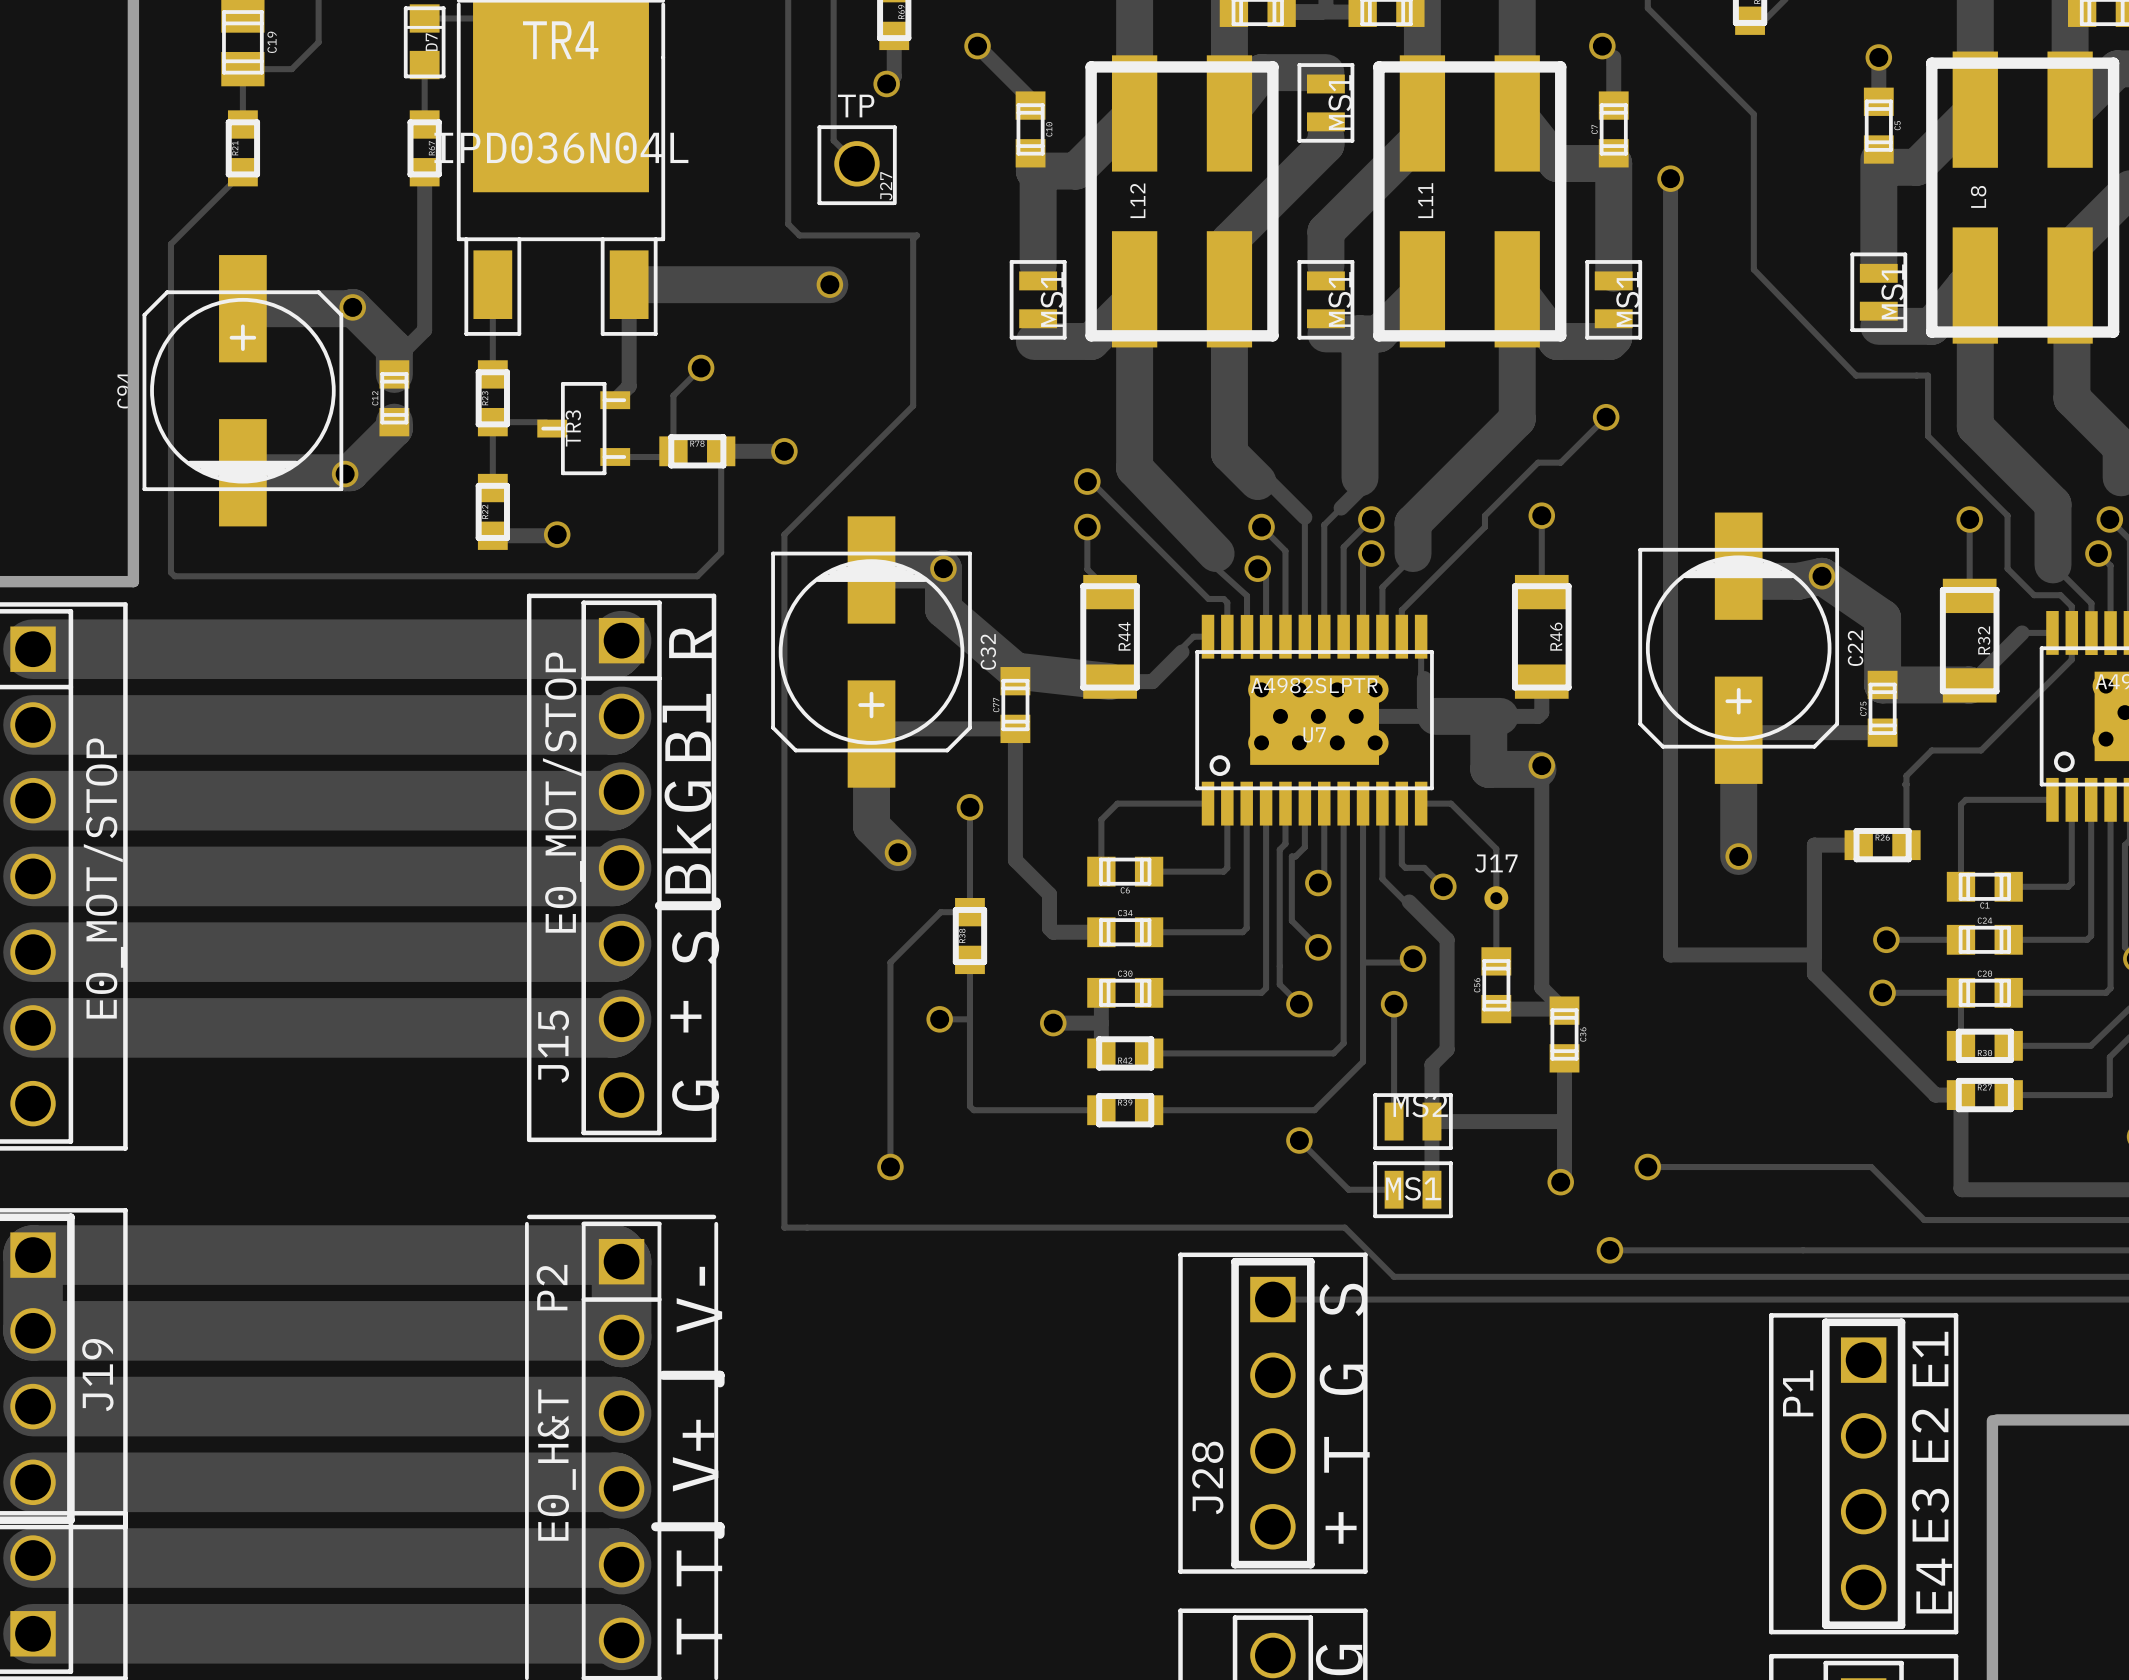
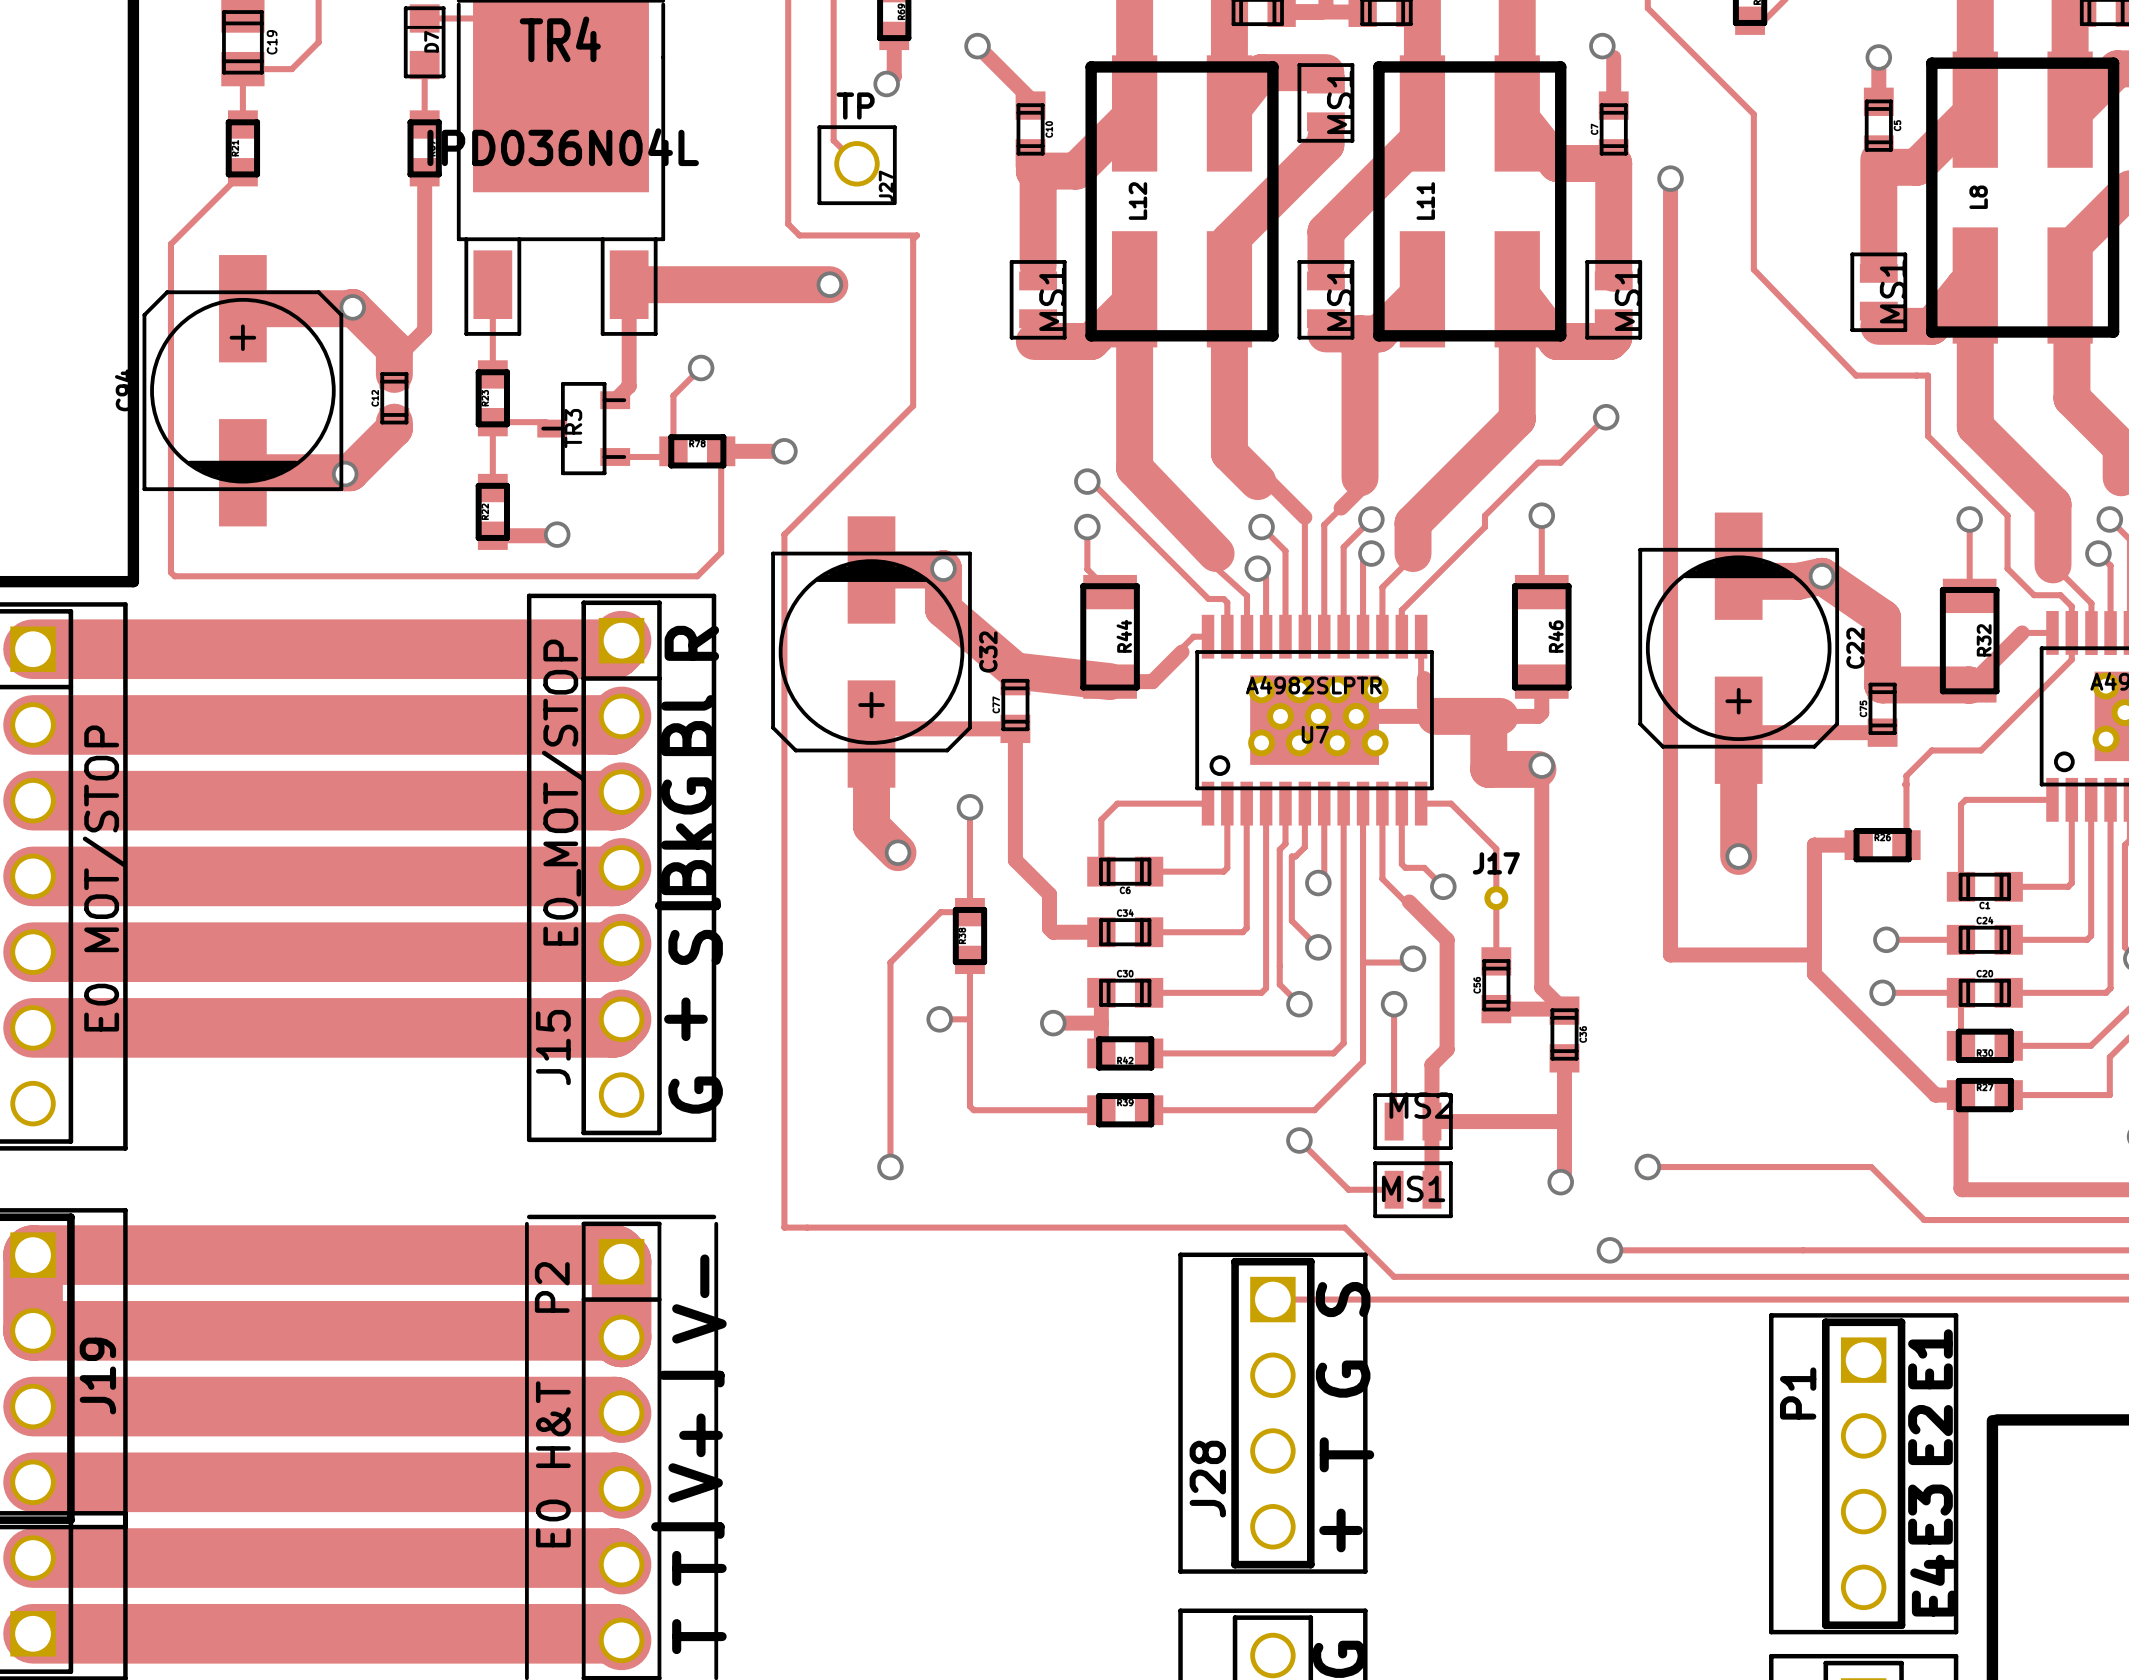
part value: E0_MOT/STOP (103, 878) -> E0 MOT/STOP (104, 878)
P2 value: E0_H&T (556, 1465) -> E0 H&T (553, 1464)

